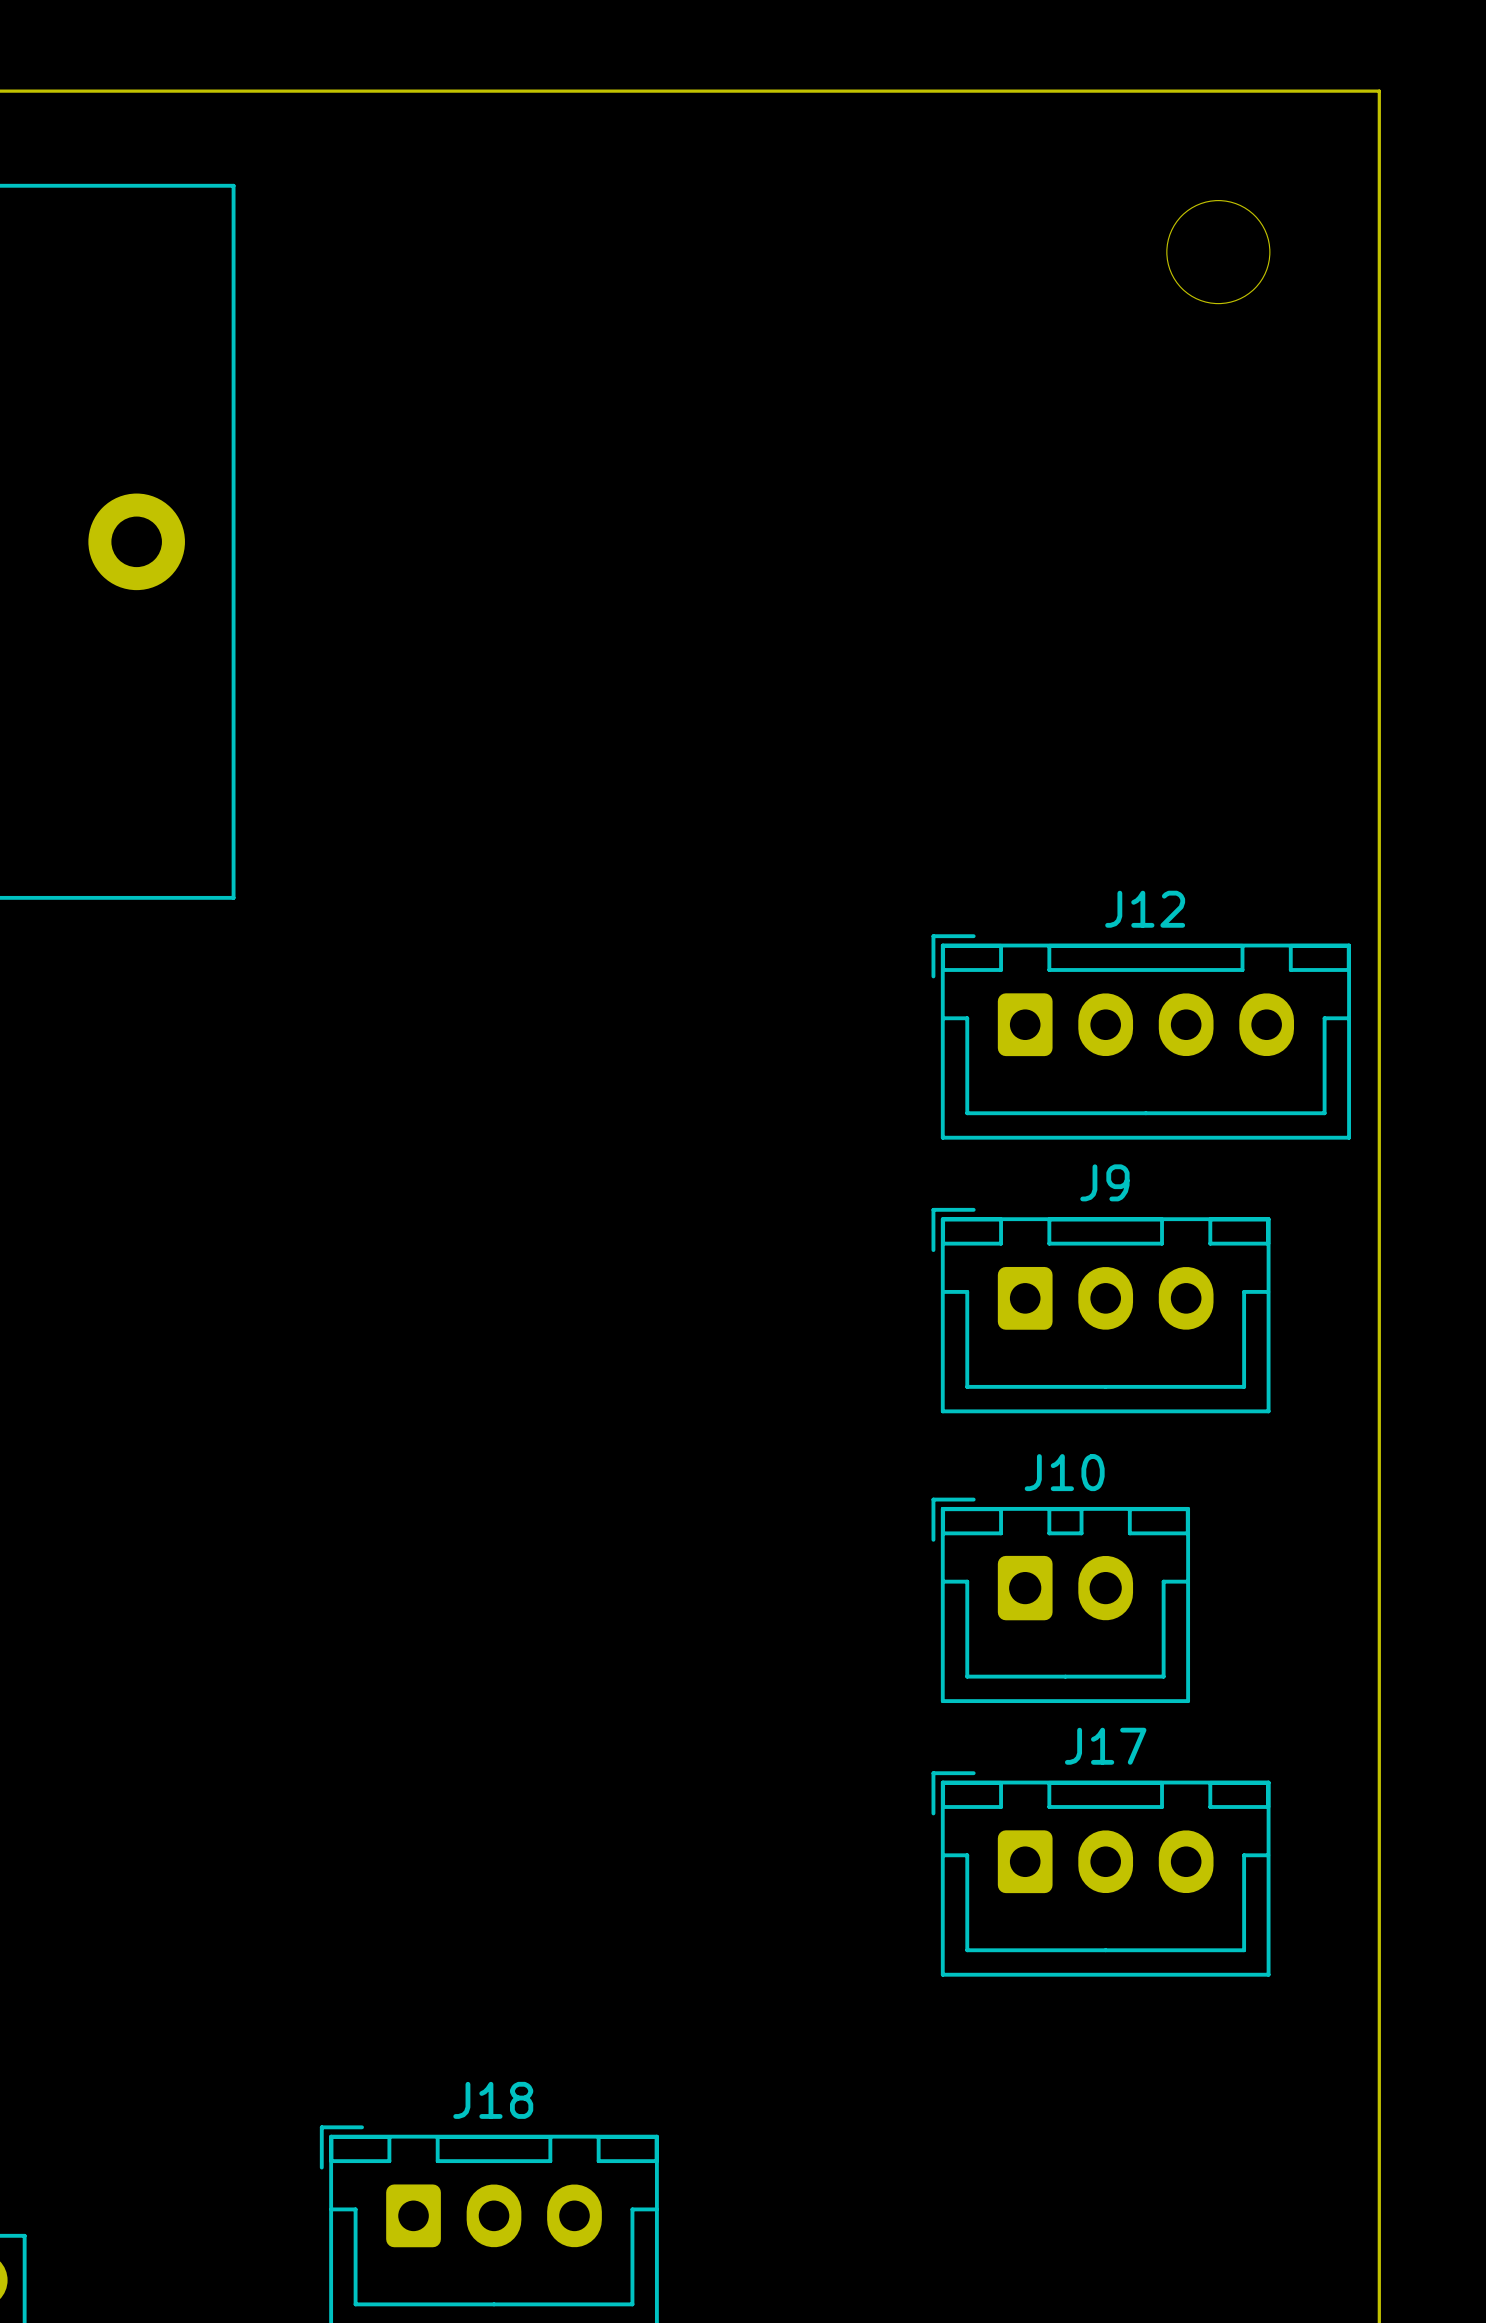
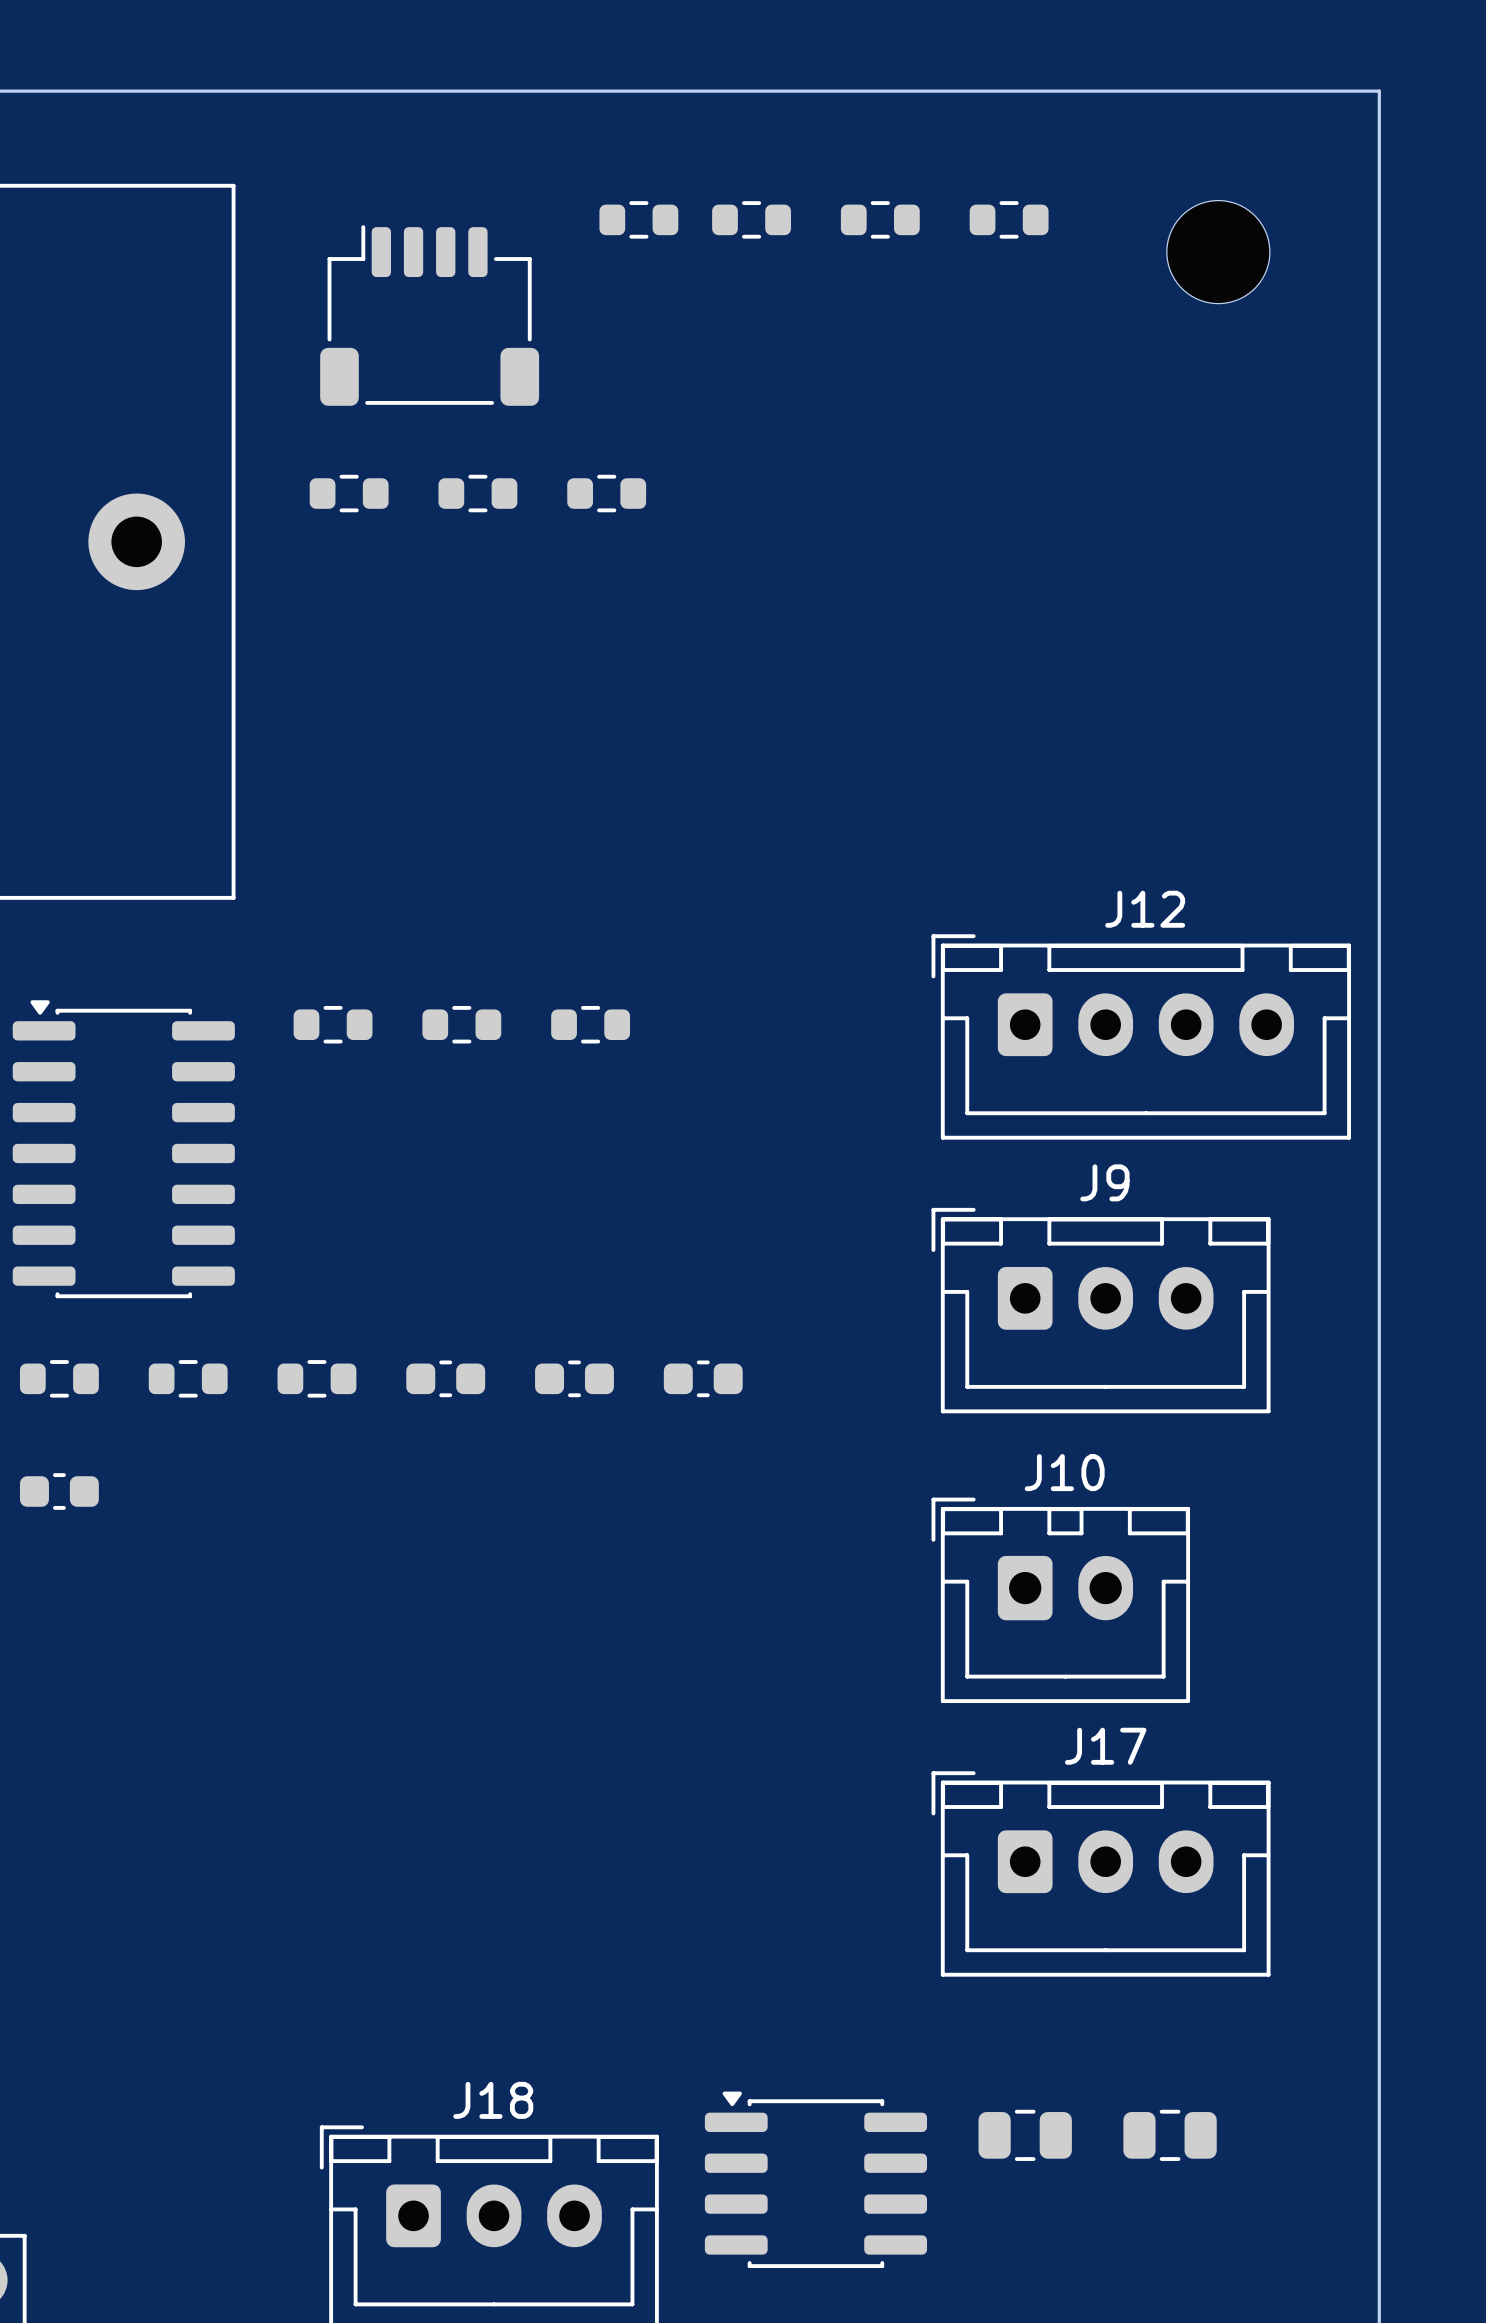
part: none -> (638, 219)
part: none -> (751, 219)
part: none -> (880, 219)
part: none -> (1009, 219)
part: none -> (429, 315)
part: none -> (349, 493)
part: none -> (477, 493)
part: none -> (606, 493)
part: none -> (333, 1024)
part: none -> (461, 1024)
part: none -> (590, 1024)
part: none -> (123, 1149)
part: none -> (59, 1378)
part: none -> (188, 1378)
part: none -> (316, 1378)
part: none -> (445, 1378)
part: none -> (574, 1378)
part: none -> (703, 1378)
part: none -> (59, 1491)
part: none -> (1025, 2135)
part: none -> (1170, 2135)
part: none -> (815, 2179)

